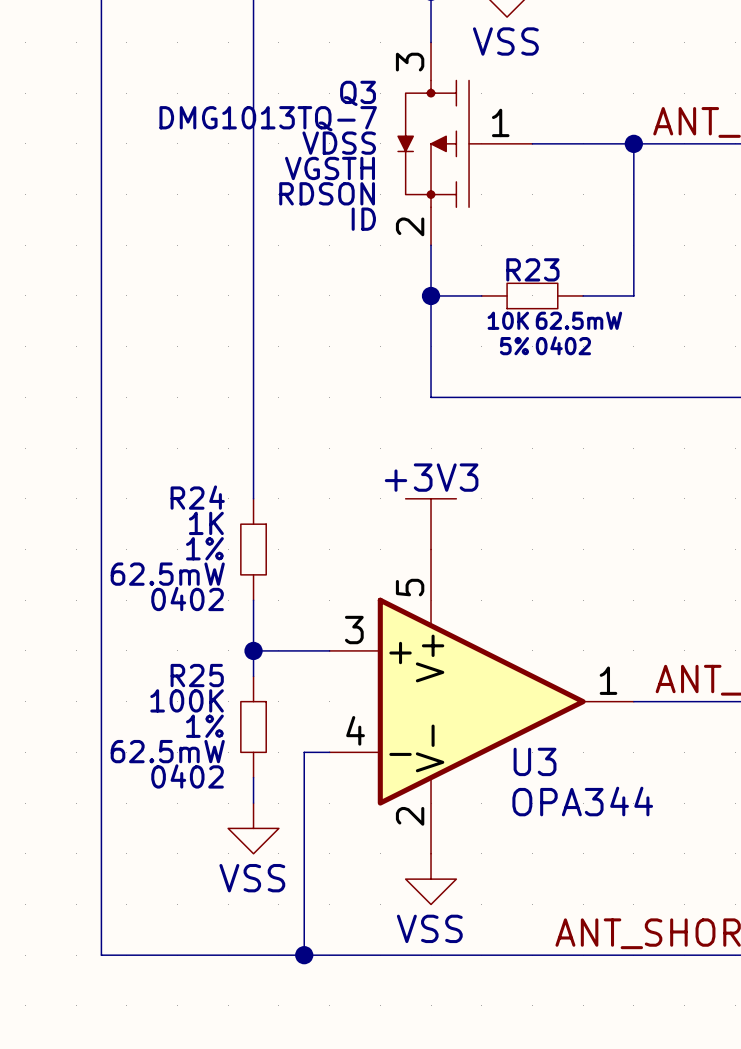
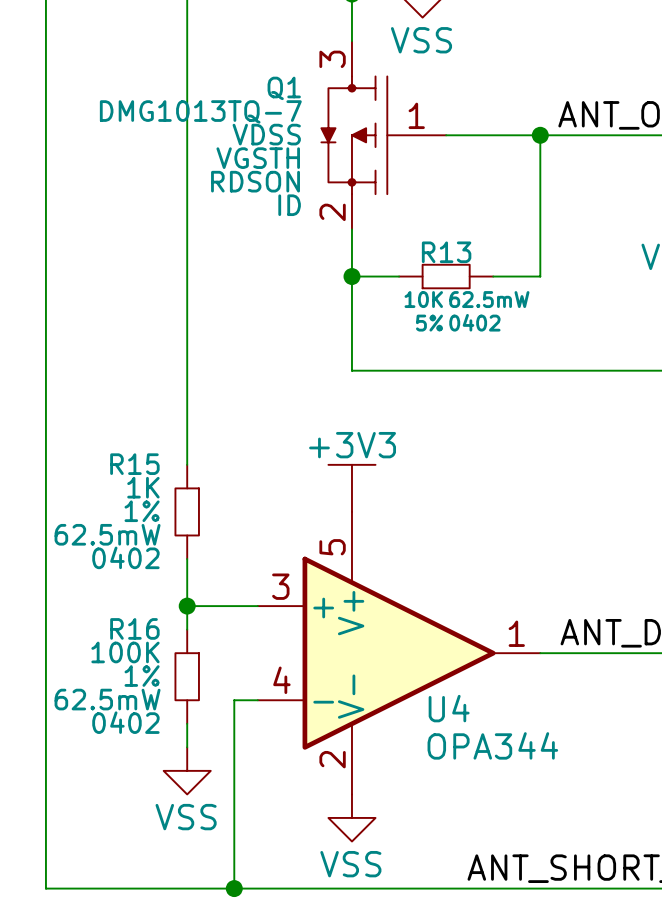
Q3 name: Q3 (358, 93) -> Q1 (284, 88)
R23 name: R23 (532, 269) -> R13 (446, 252)
R24 name: R24 (197, 497) -> R15 (134, 464)
R25 name: R25 (197, 675) -> R16 (134, 628)
U3 name: U3 (535, 761) -> U4 (449, 708)

